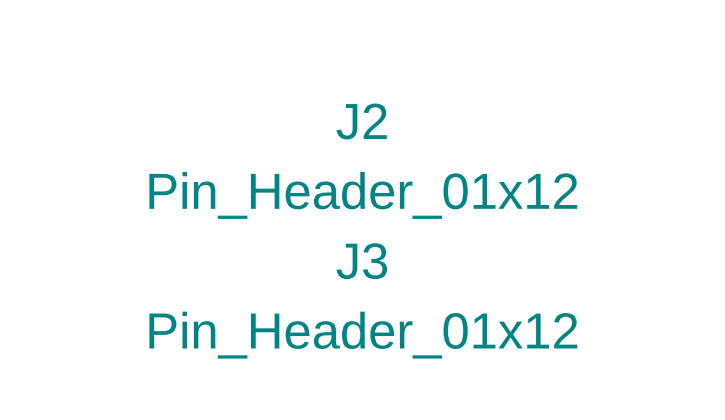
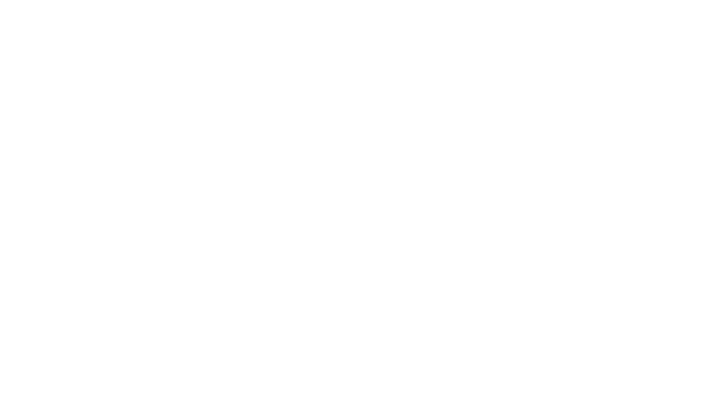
J2: Pin_Header_01x12 (363, 161) -> none
J3: Pin_Header_01x12 (363, 300) -> none

